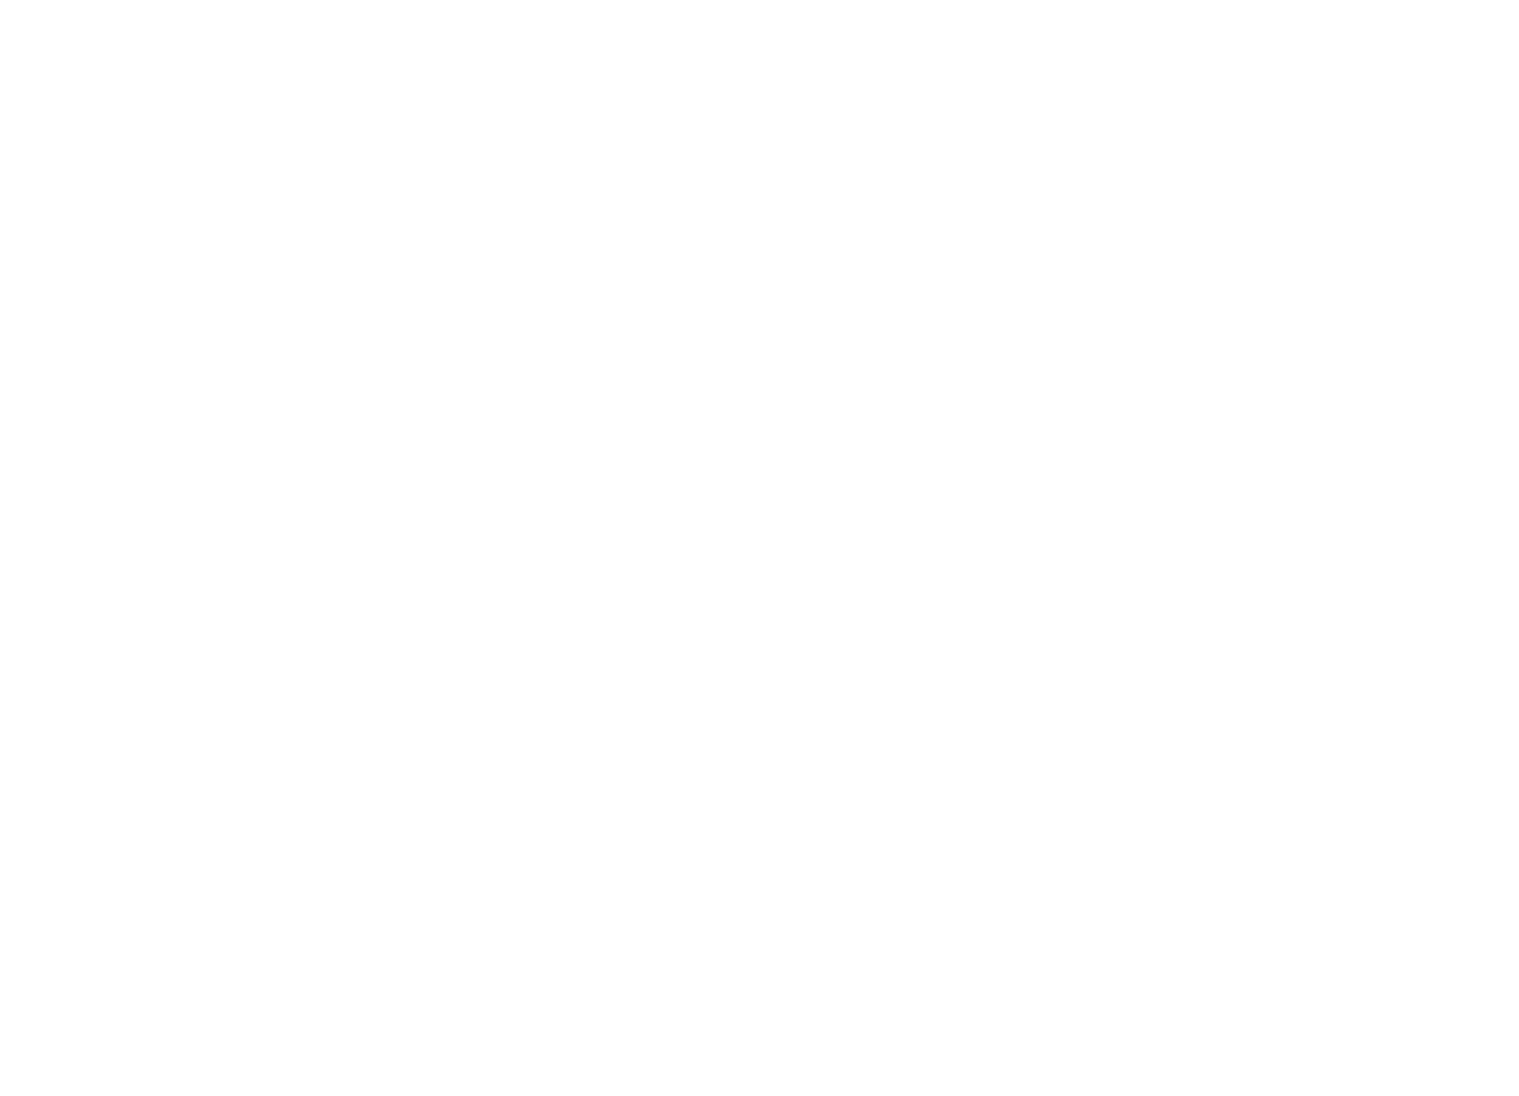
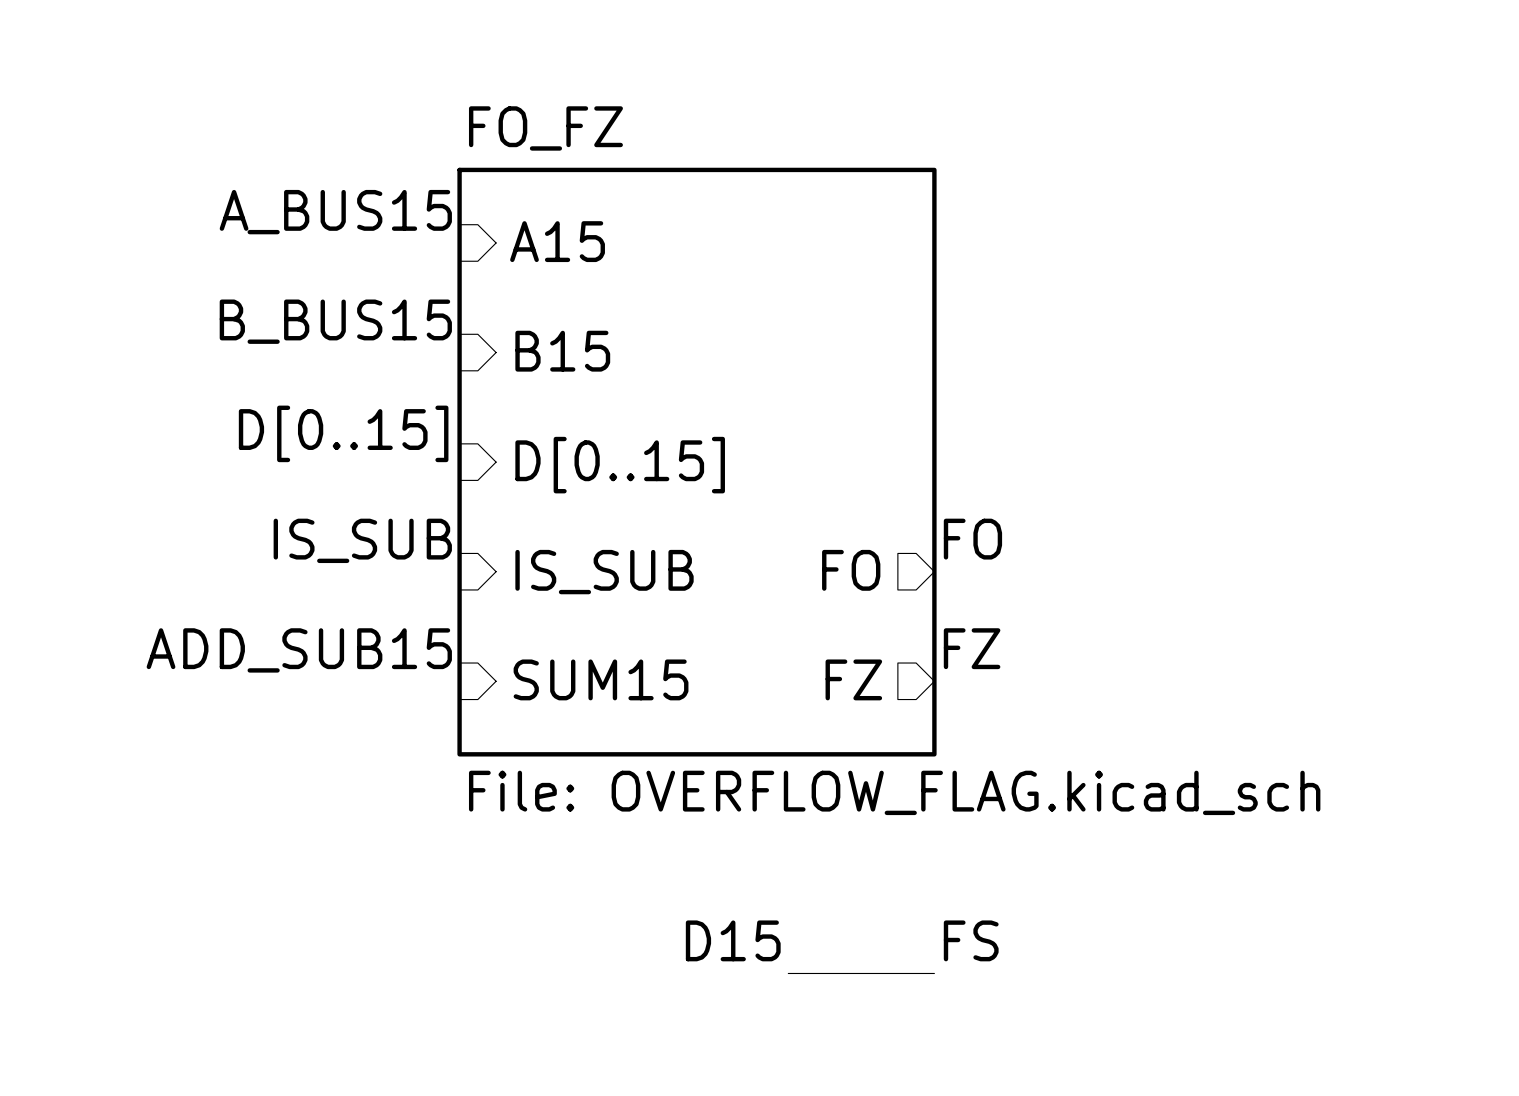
label: none -> A_BUS15 (335, 212)
sheet pin: none -> A15 (557, 241)
label: none -> B_BUS15 (335, 321)
sheet pin: none -> B15 (562, 351)
label: none -> D[0..15] (343, 433)
sheet FO_FZ: none -> File: OVERFLOW_FLAG.kicad_sch (696, 462)
sheet pin: none -> D[0..15] (620, 465)
label: none -> FO (972, 539)
label: none -> IS_SUB (362, 540)
sheet pin: none -> FO (851, 570)
sheet pin: none -> IS_SUB (604, 572)
label: none -> FZ (972, 648)
label: none -> ADD_SUB15 (299, 650)
sheet pin: none -> SUM15 (601, 679)
sheet pin: none -> FZ (853, 679)
label: none -> D15 (733, 940)
label: none -> FS (971, 940)
wire: none -> (788, 973) (934, 973)

